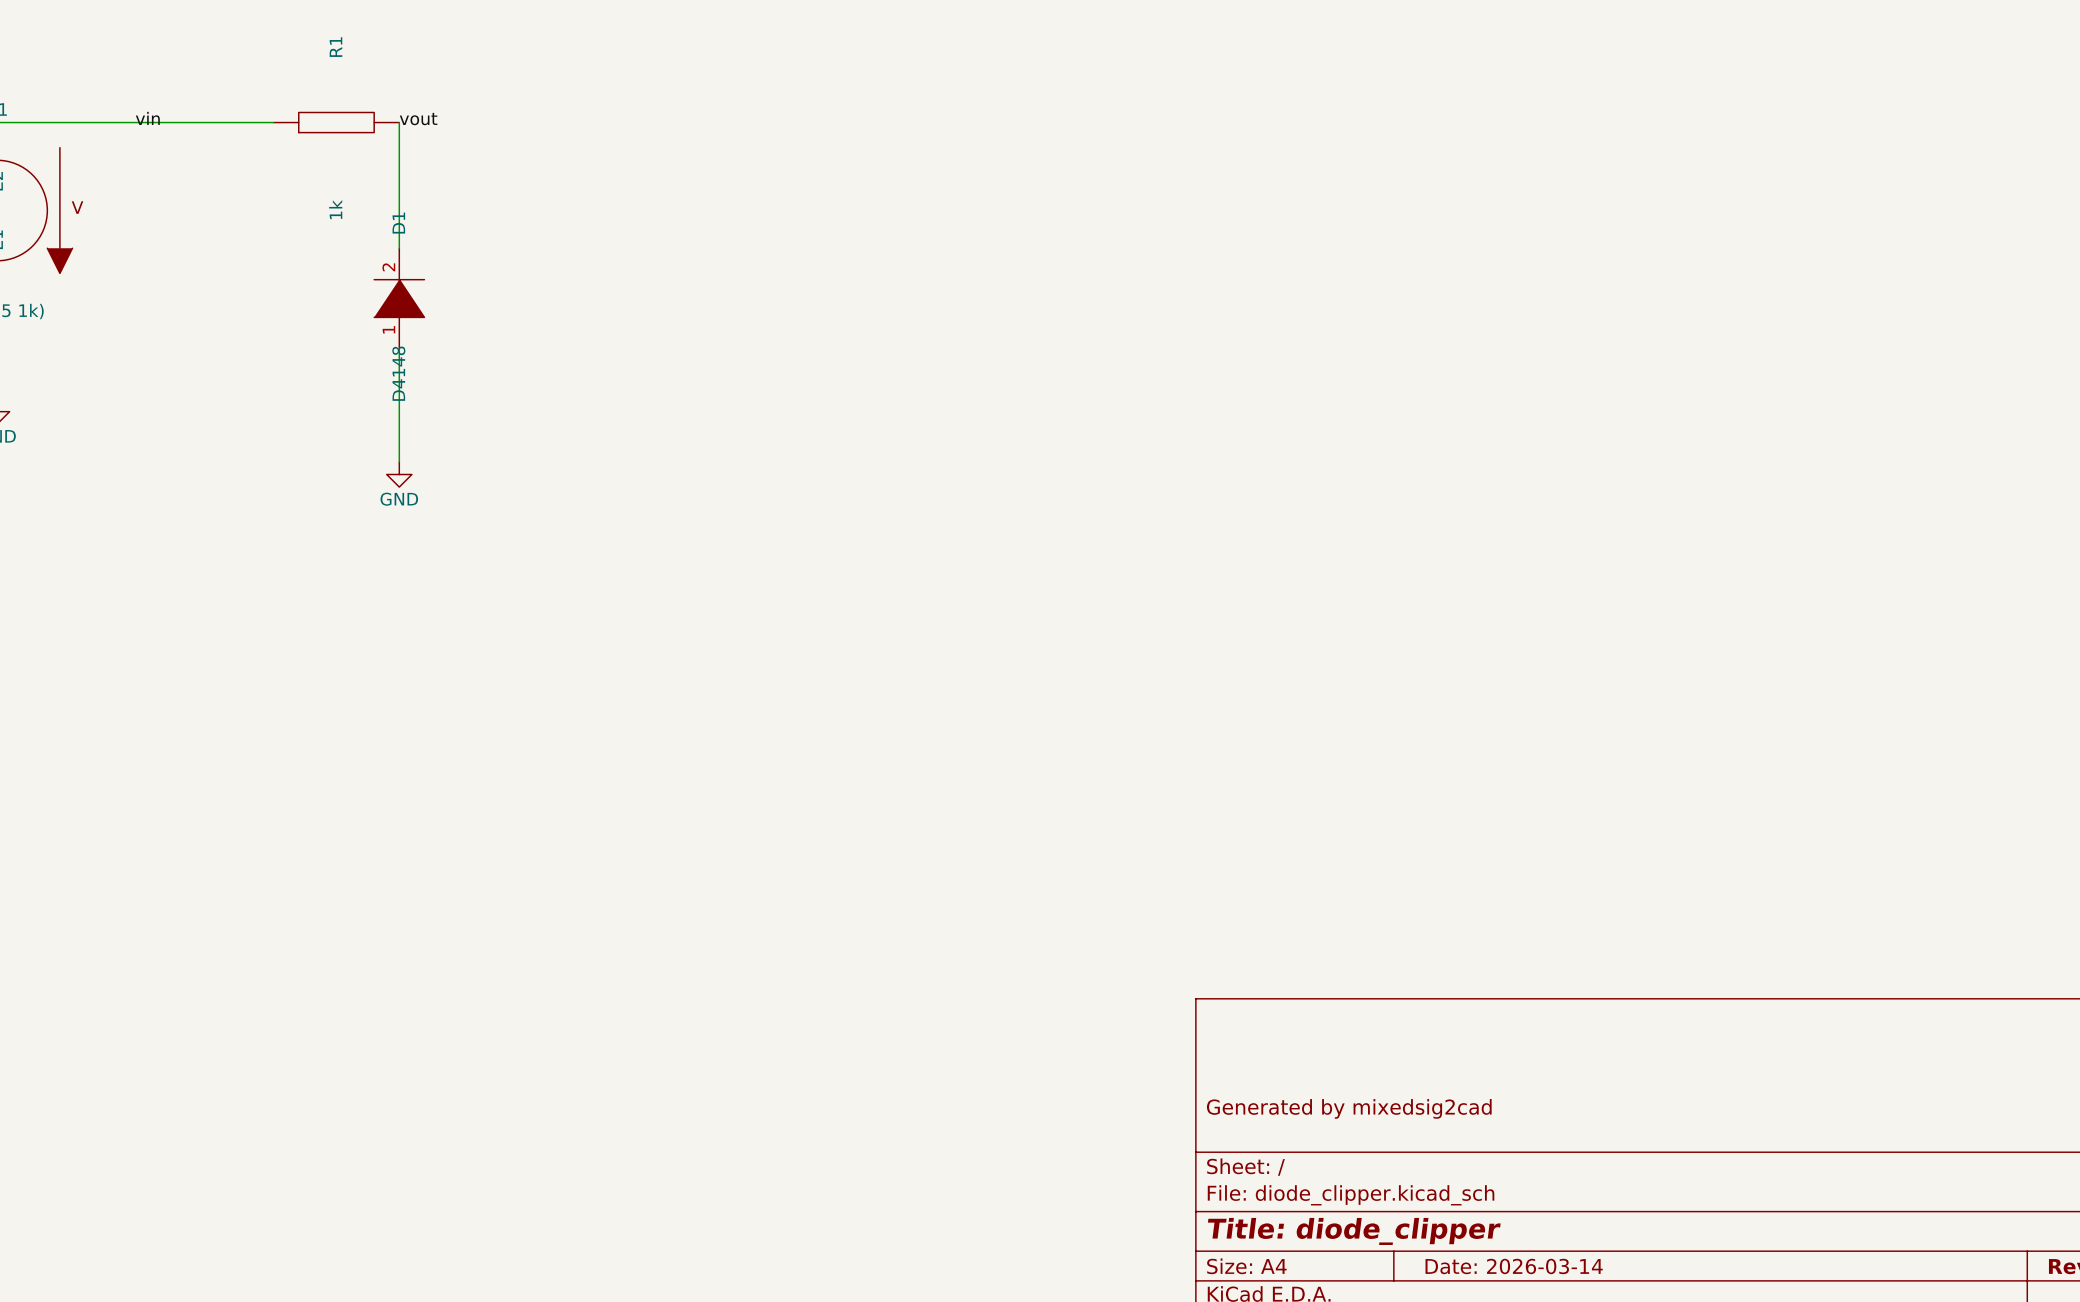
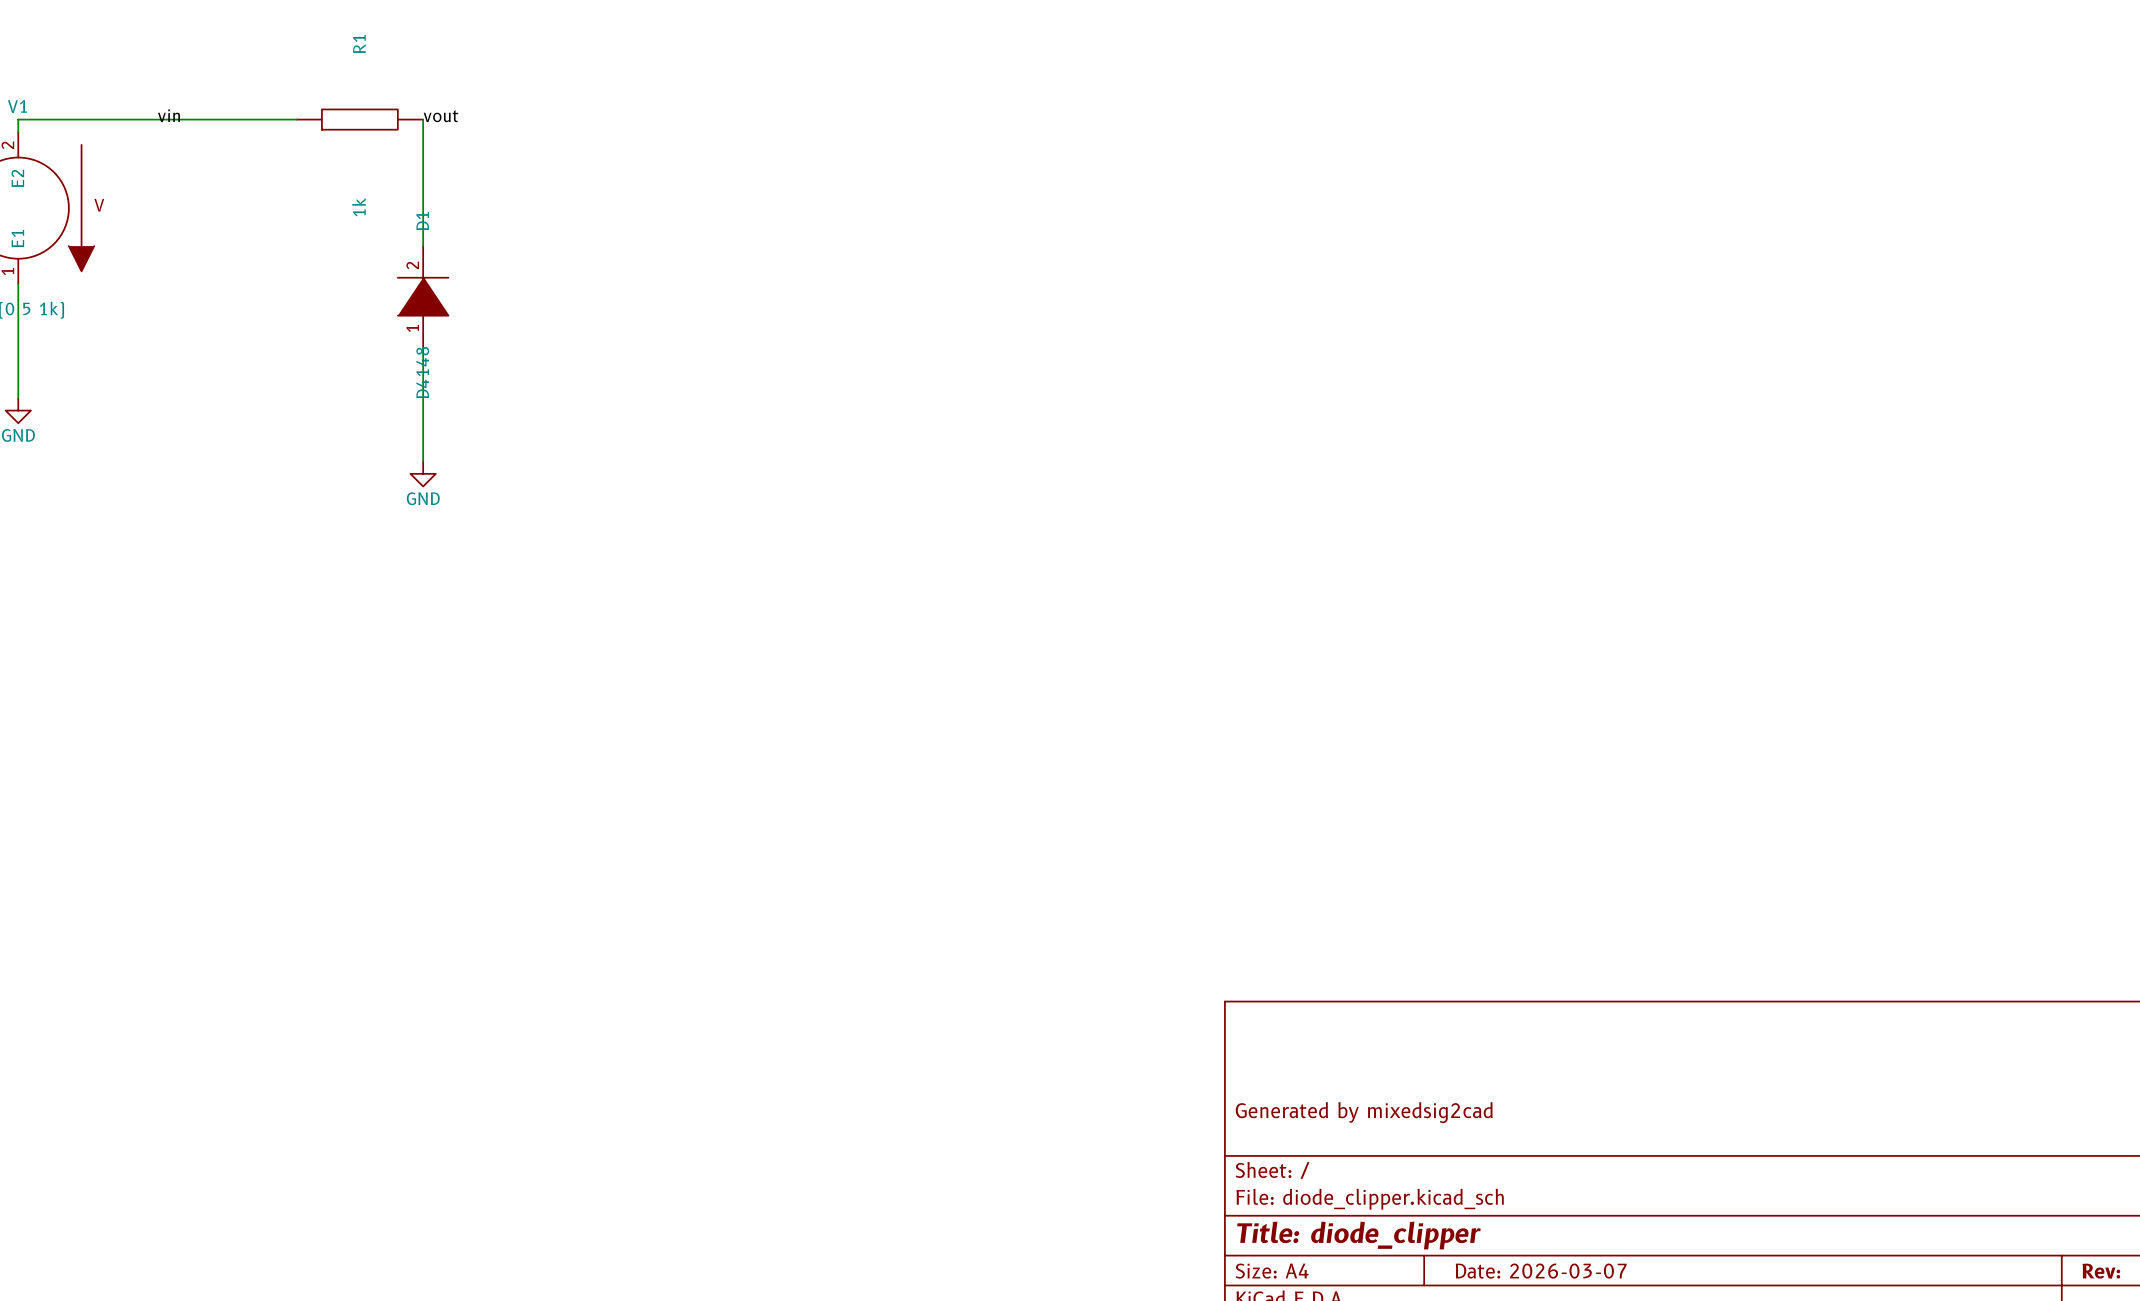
title block: Date: 2026-03-14 (1514, 1266) -> Date: 2026-03-07 (1541, 1271)

